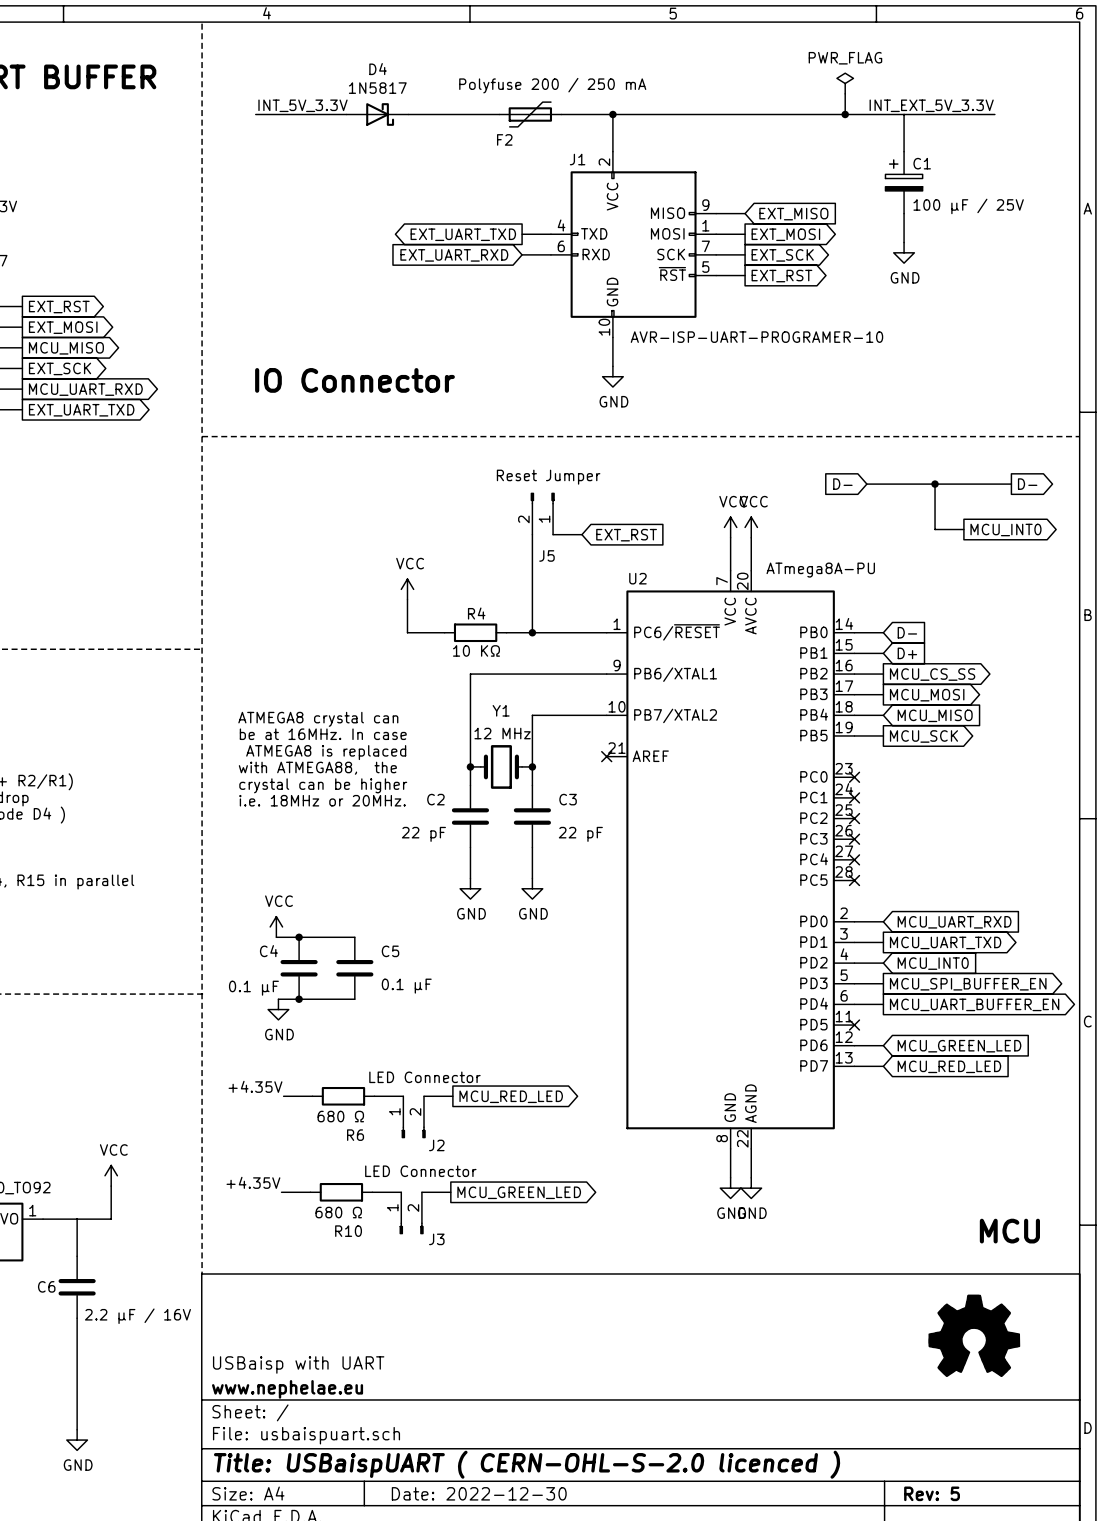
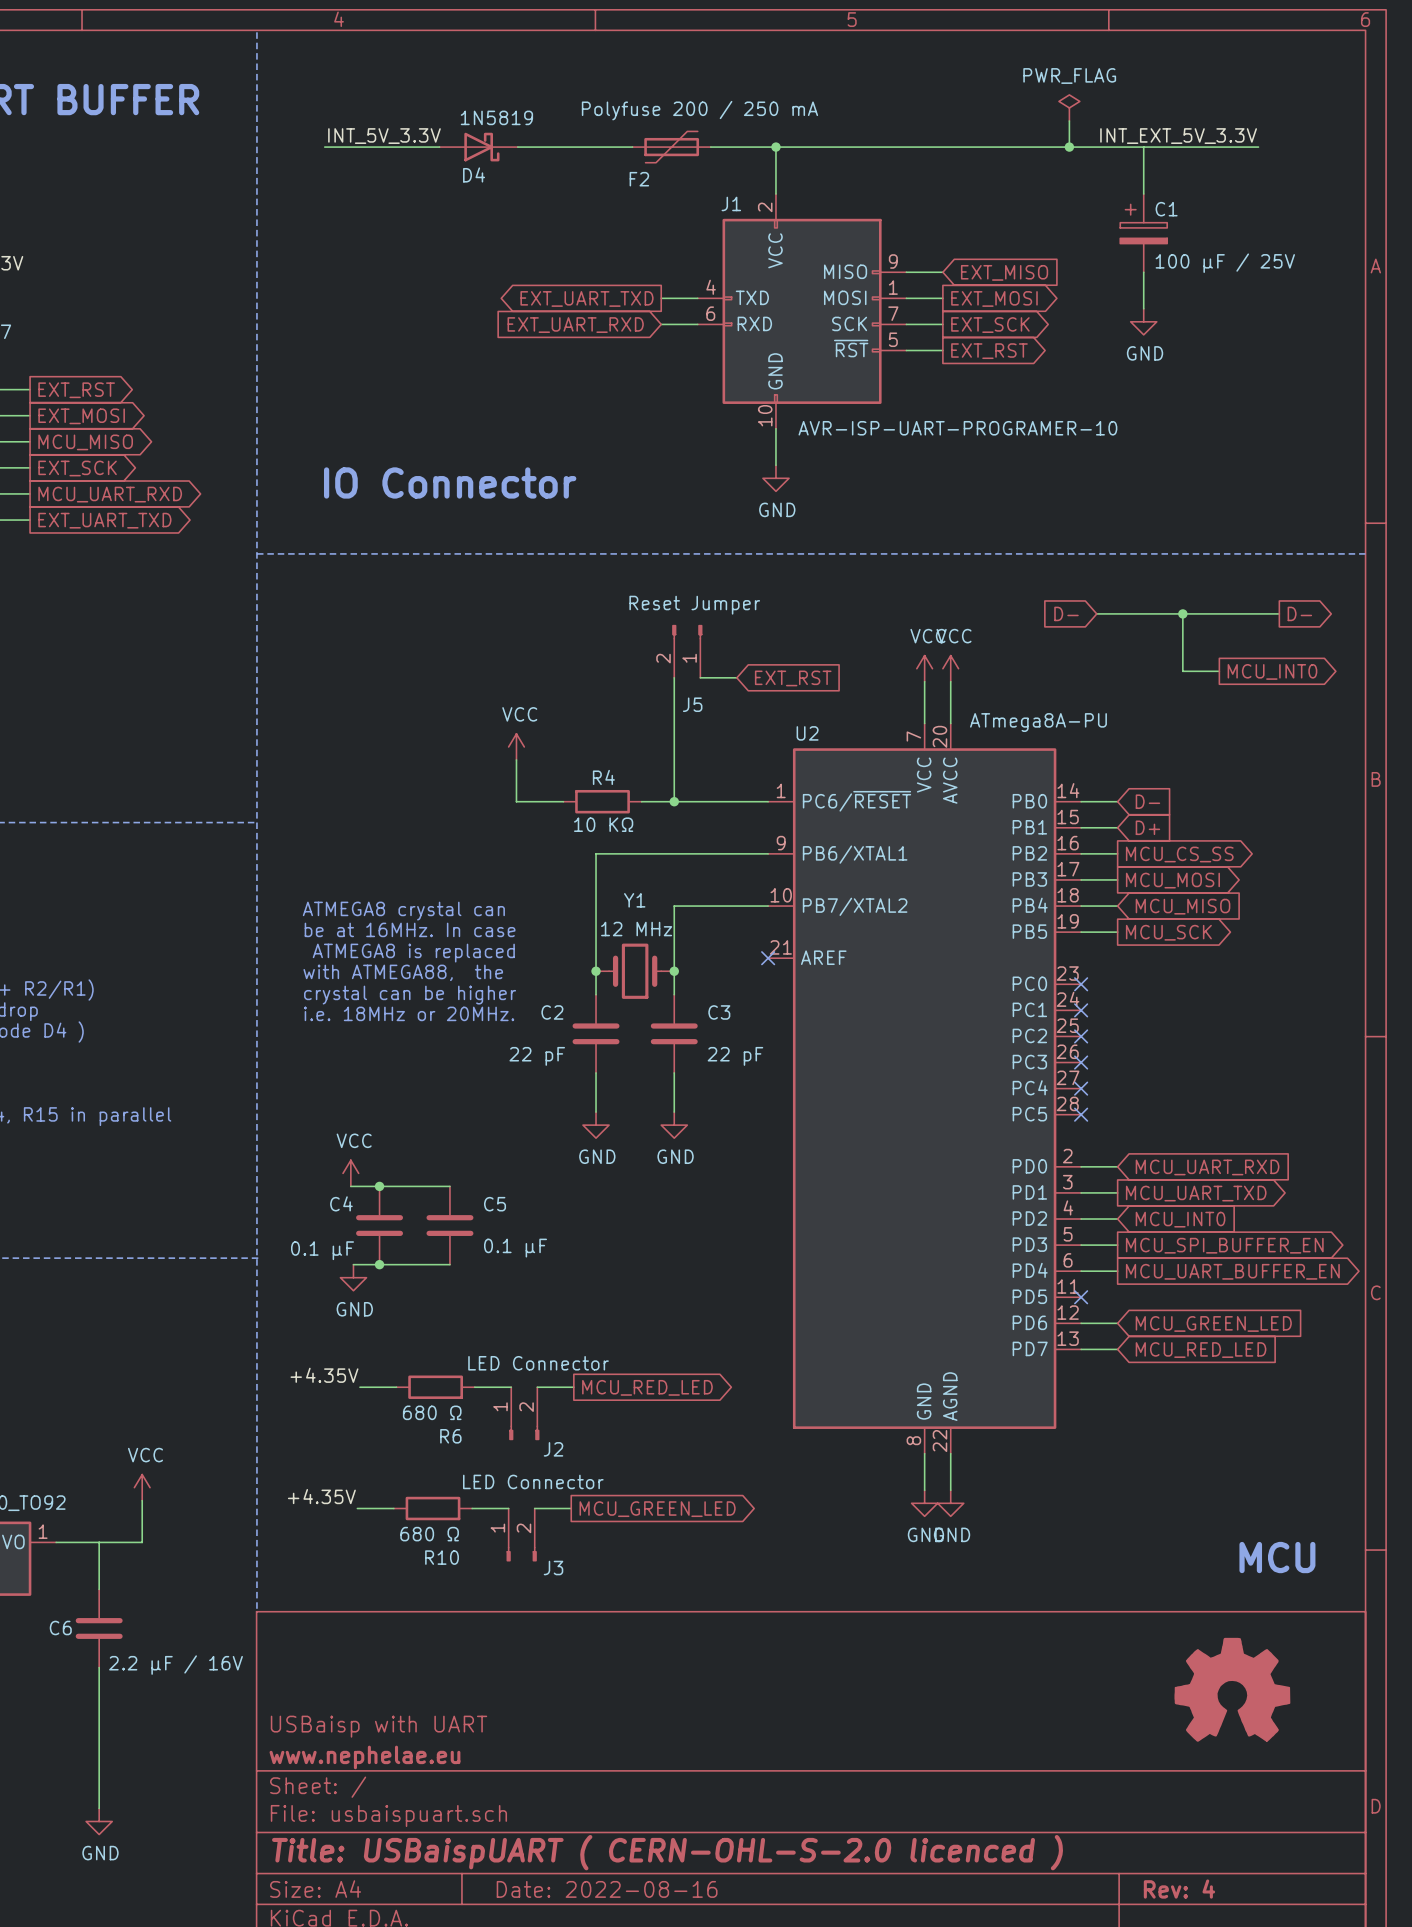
D4 name position: D4 (378, 69) -> D4 (474, 174)
D4 value: 1N5817 (377, 88) -> 1N5819 (496, 117)
title block: Date: 2022-12-30 (479, 1493) -> Date: 2022-08-16 (607, 1889)
title block: Rev: 5 (932, 1493) -> Rev: 4 (1179, 1889)

